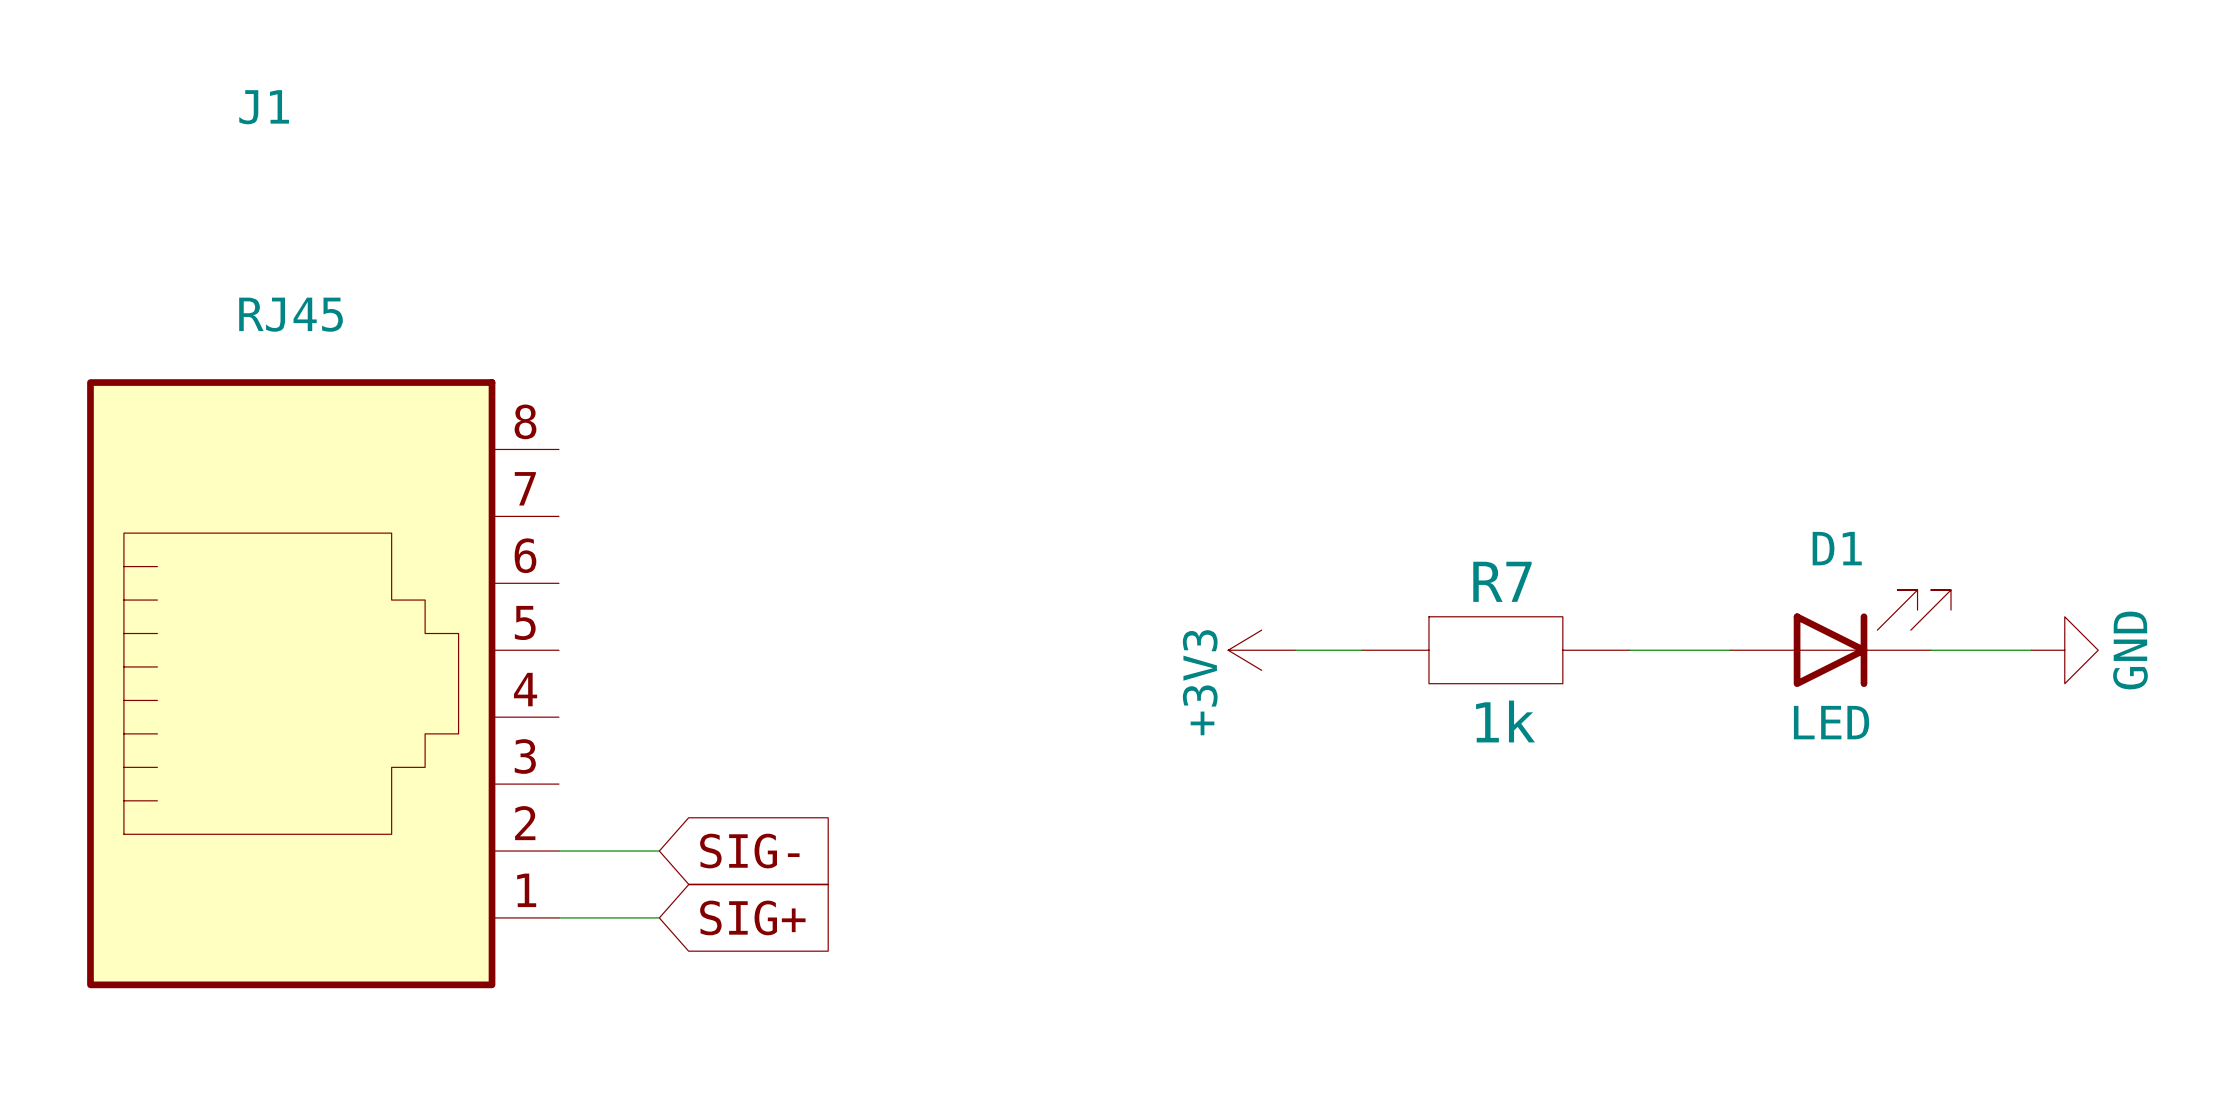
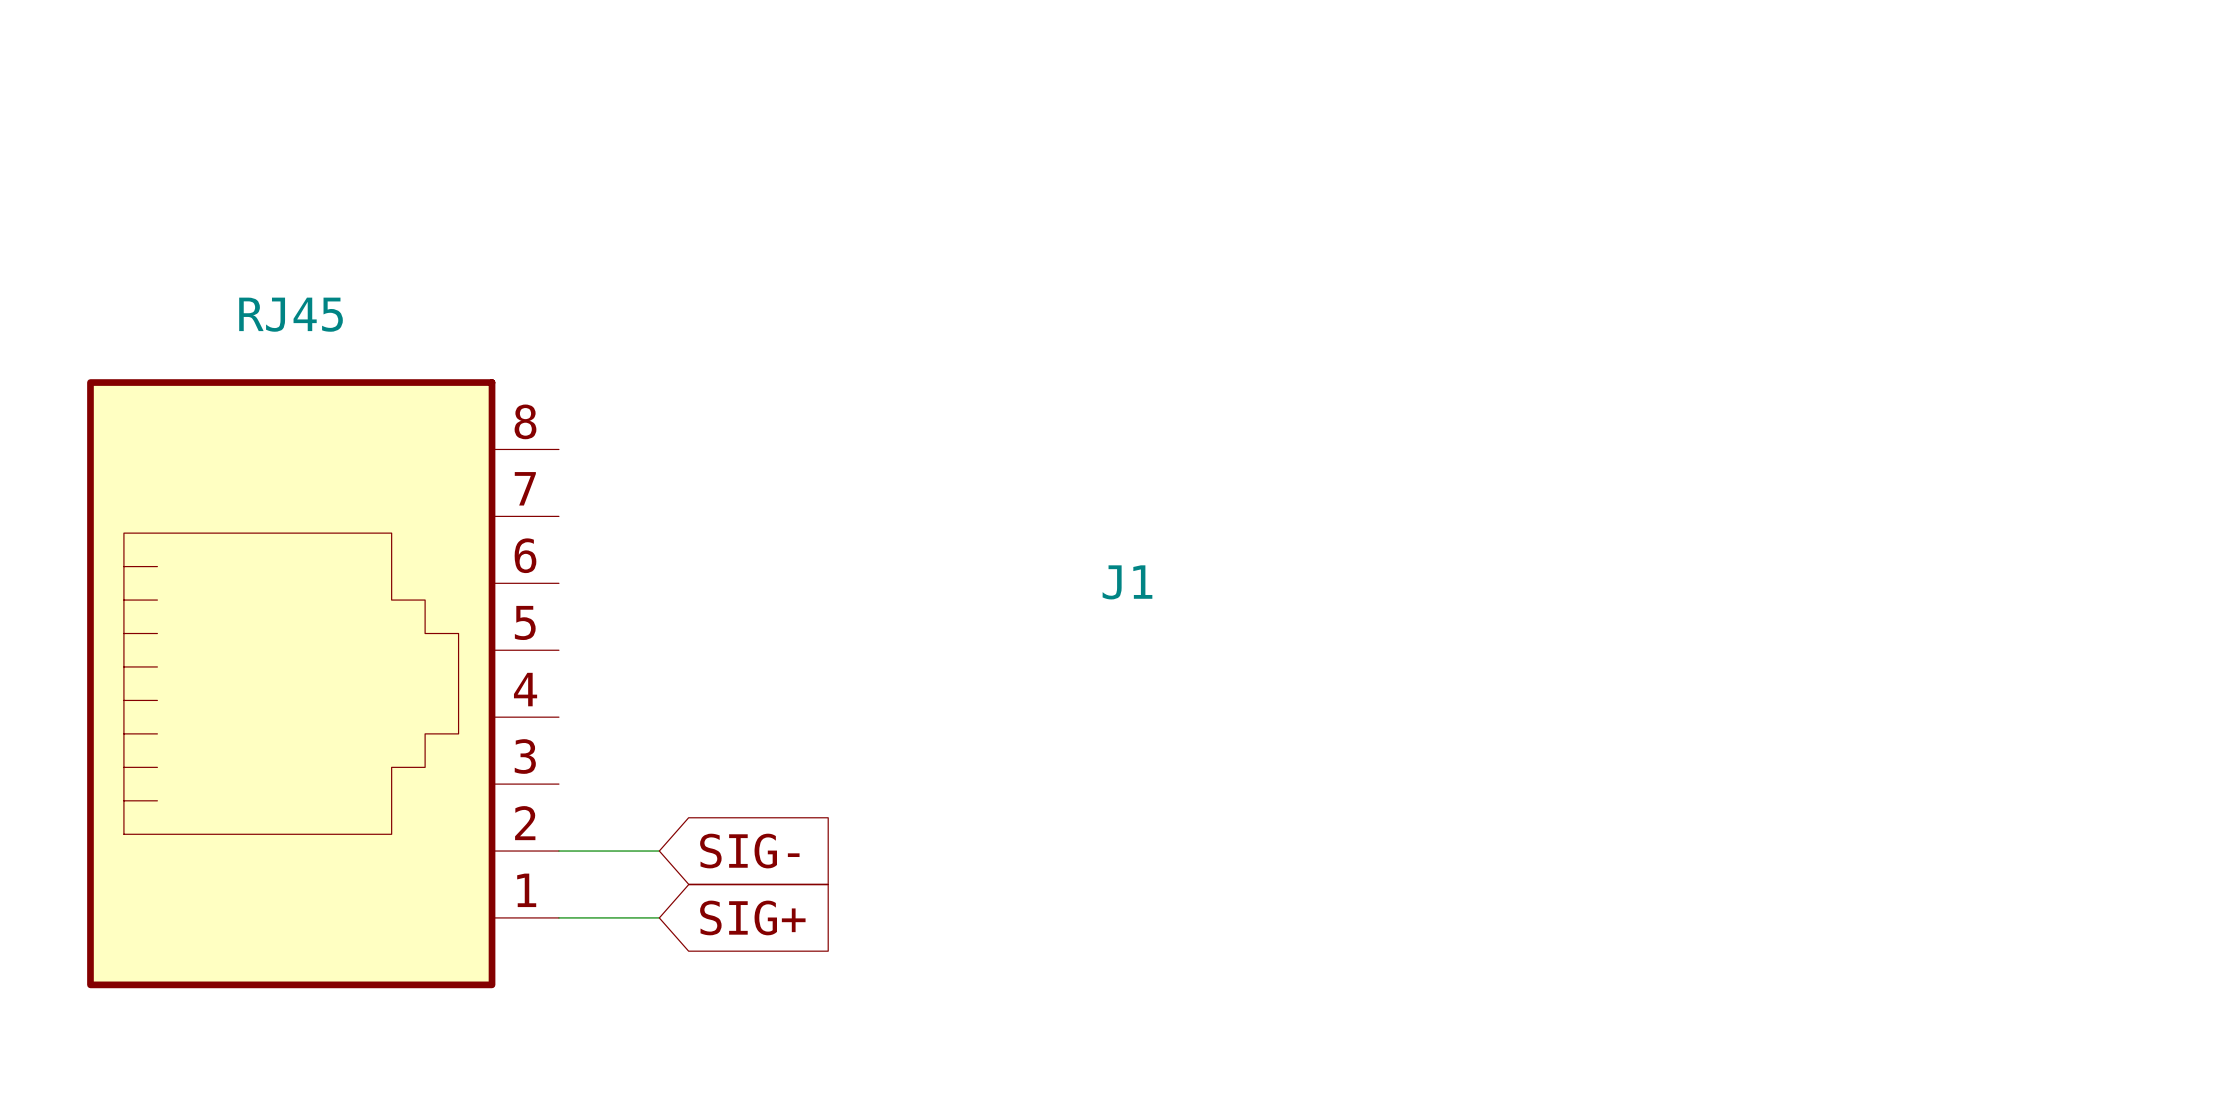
J1 name position: J1 (264, 107) -> J1 (1127, 582)
D1: LED (1840, 638) -> none
power symbol: +3V3 (1261, 650) -> none
wire: (1295, 650) (1362, 650) -> none
R7: 1k (1495, 650) -> none
wire: (1629, 650) (1730, 650) -> none
wire: (1930, 650) (2031, 650) -> none
power symbol: GND (2064, 650) -> none

